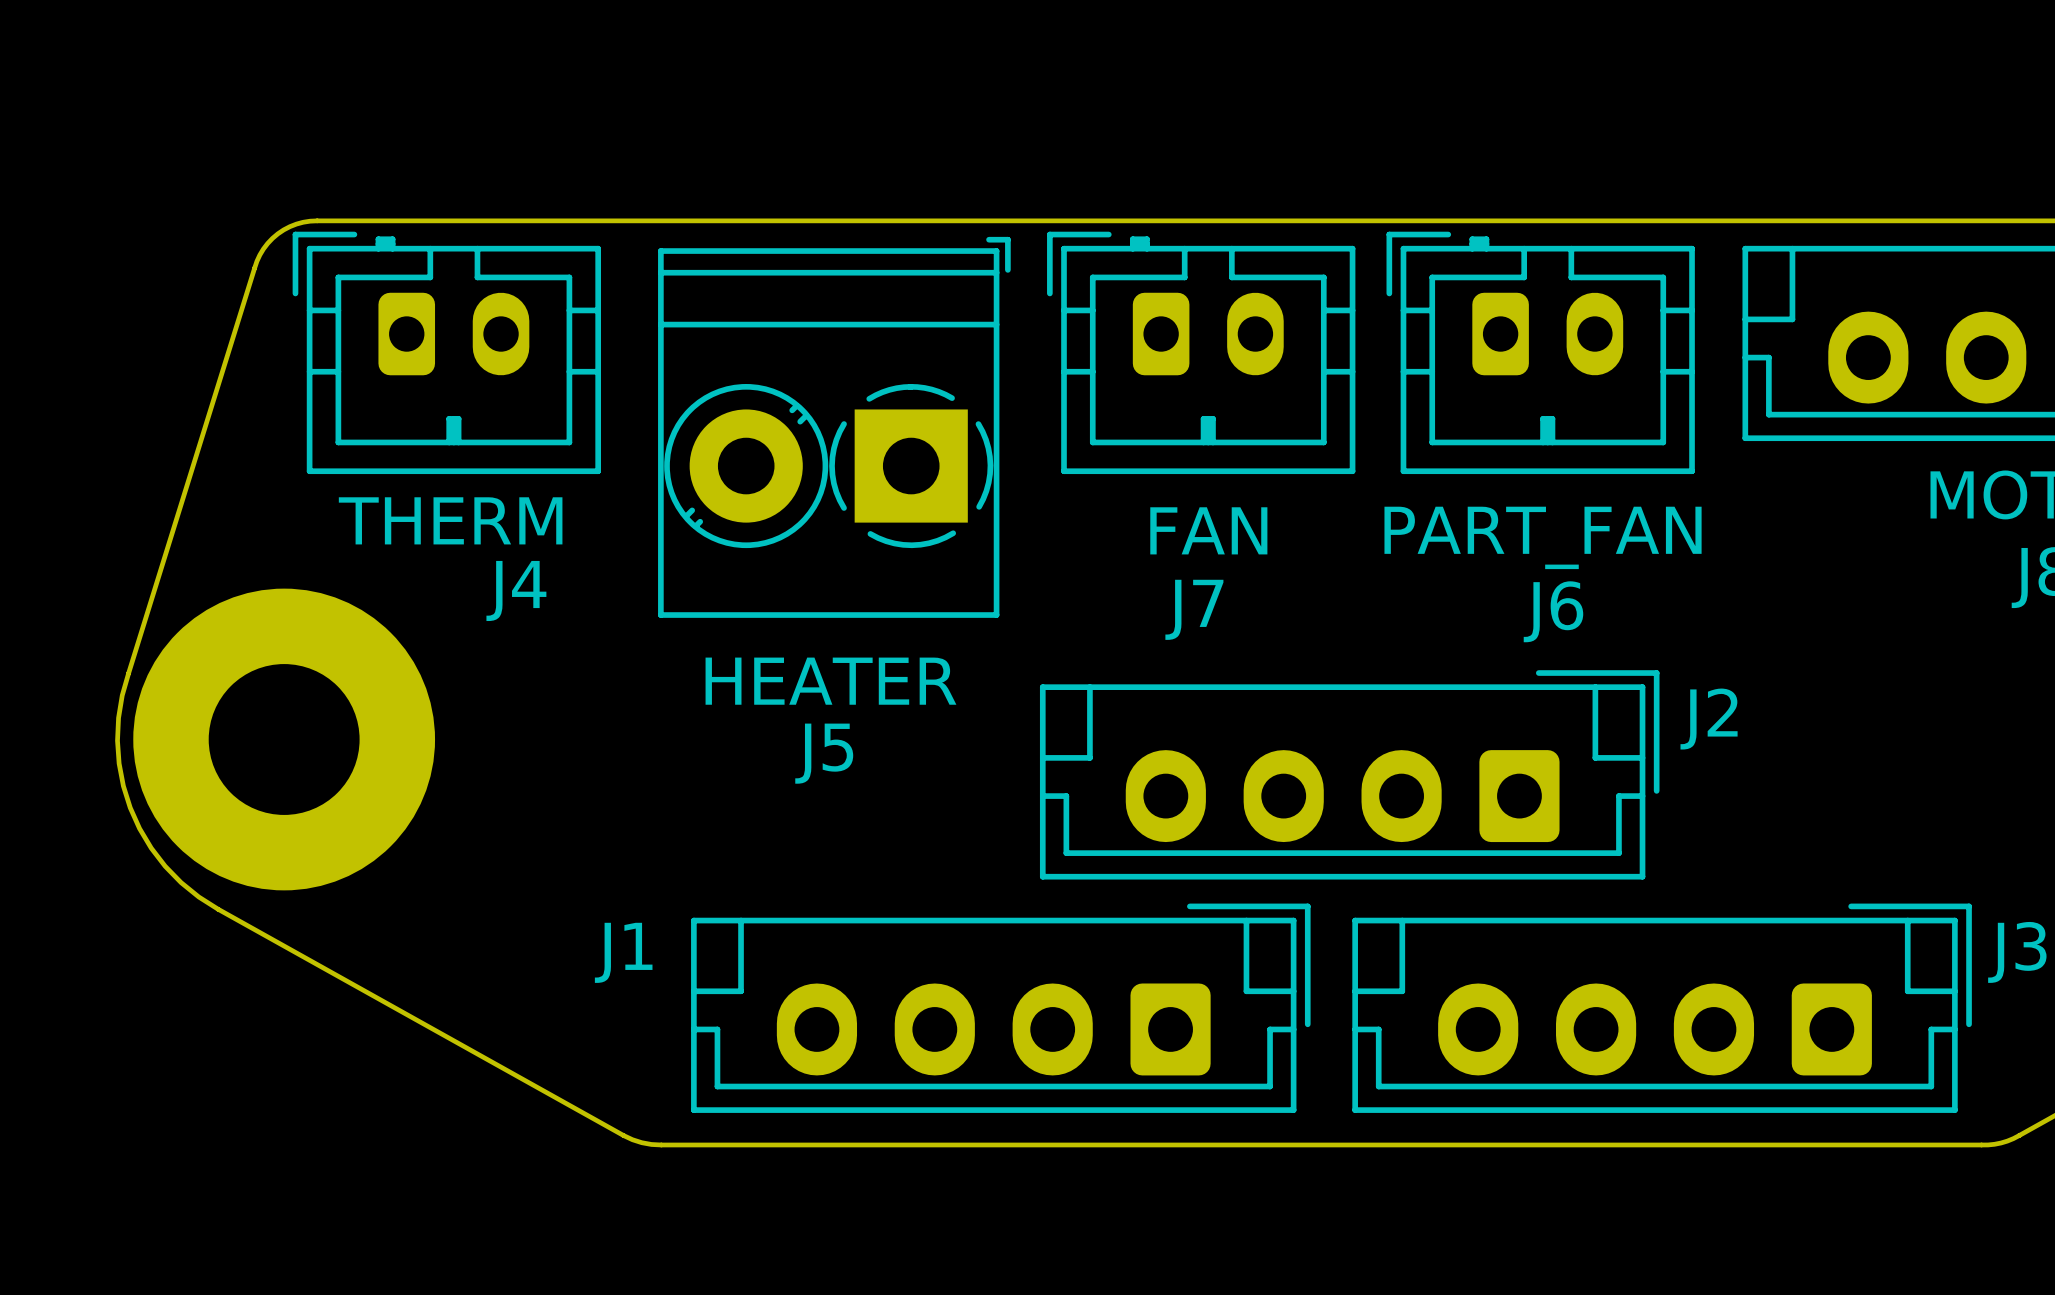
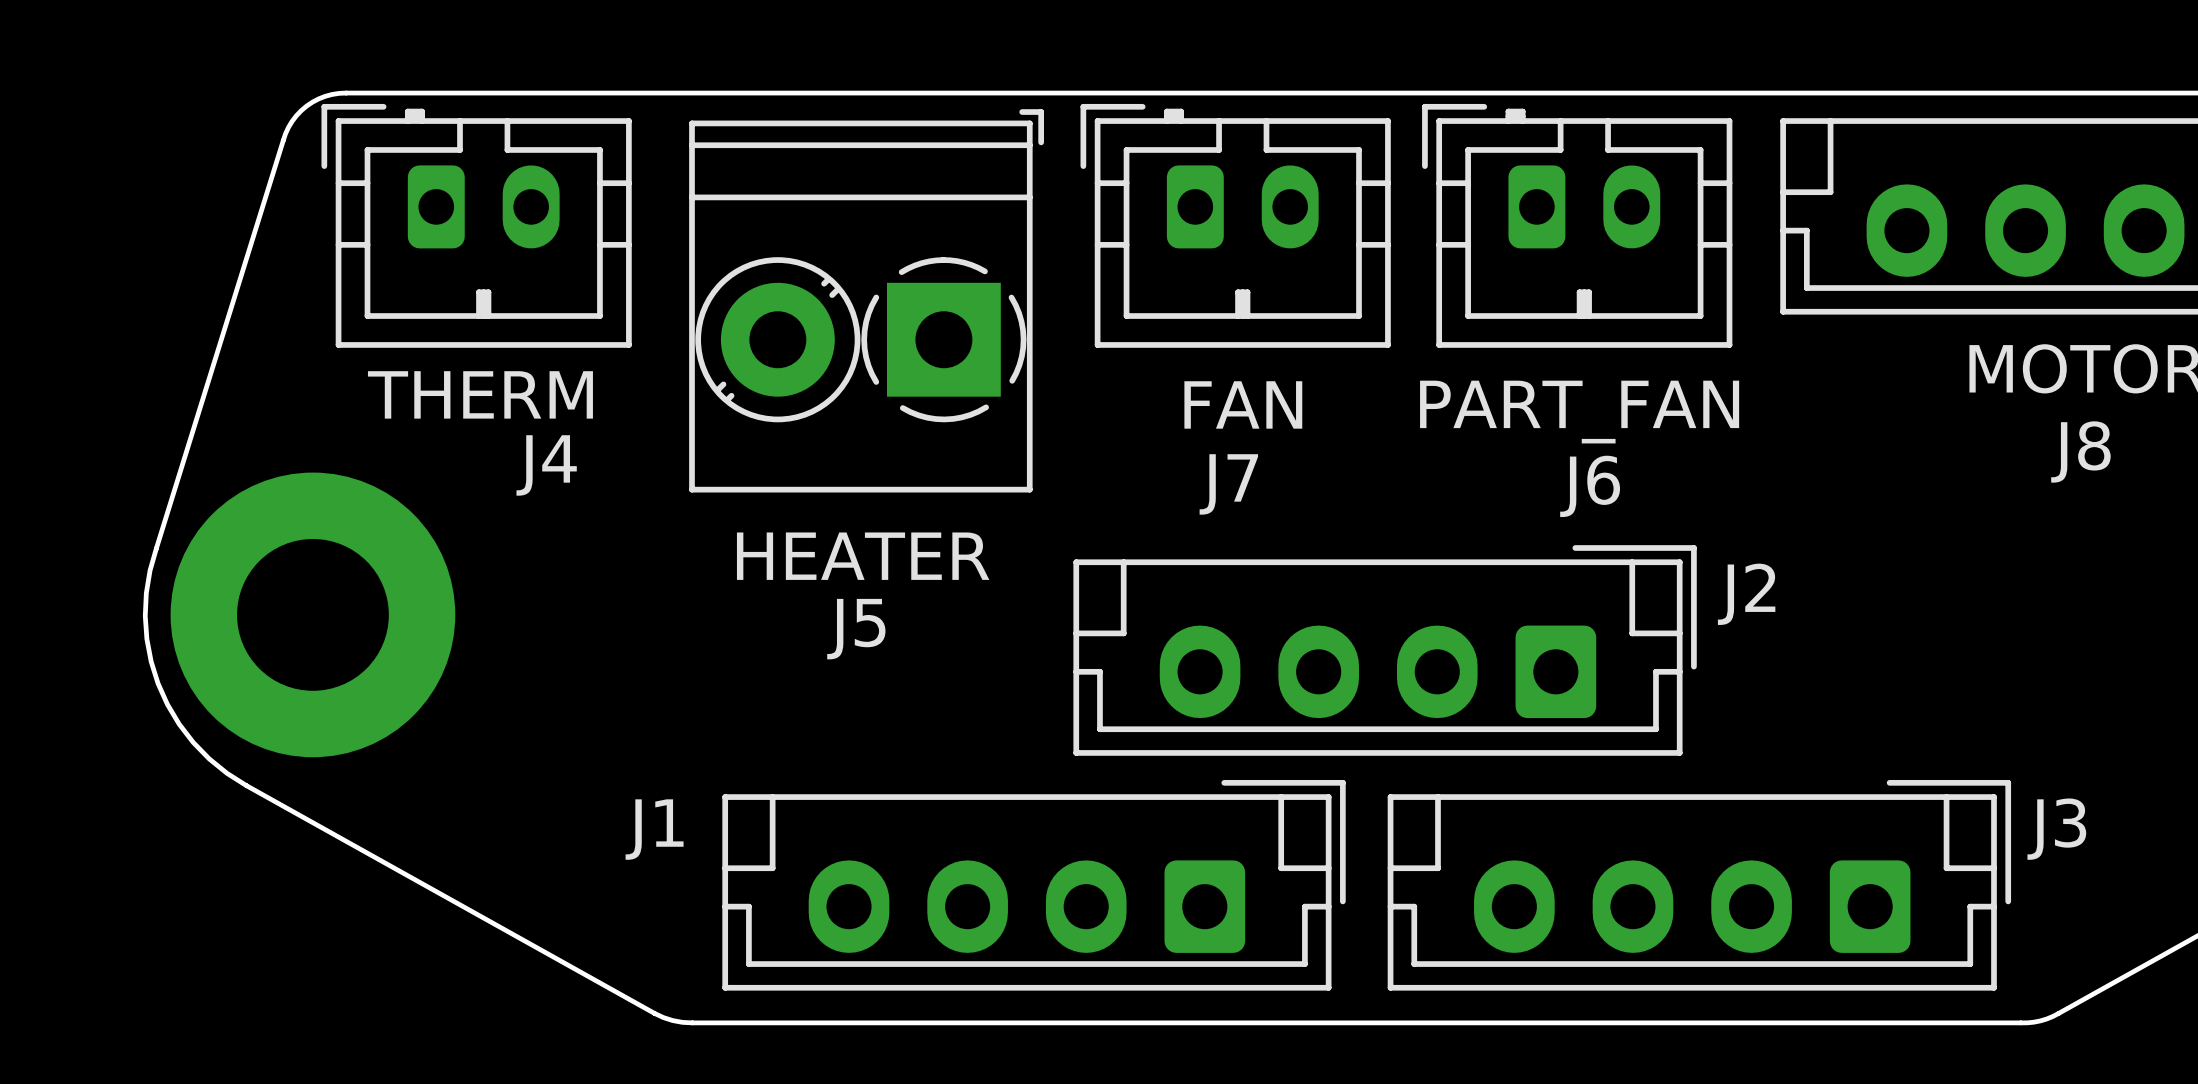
part footprint: [133, 588, 436, 891] -> [170, 472, 456, 758]

